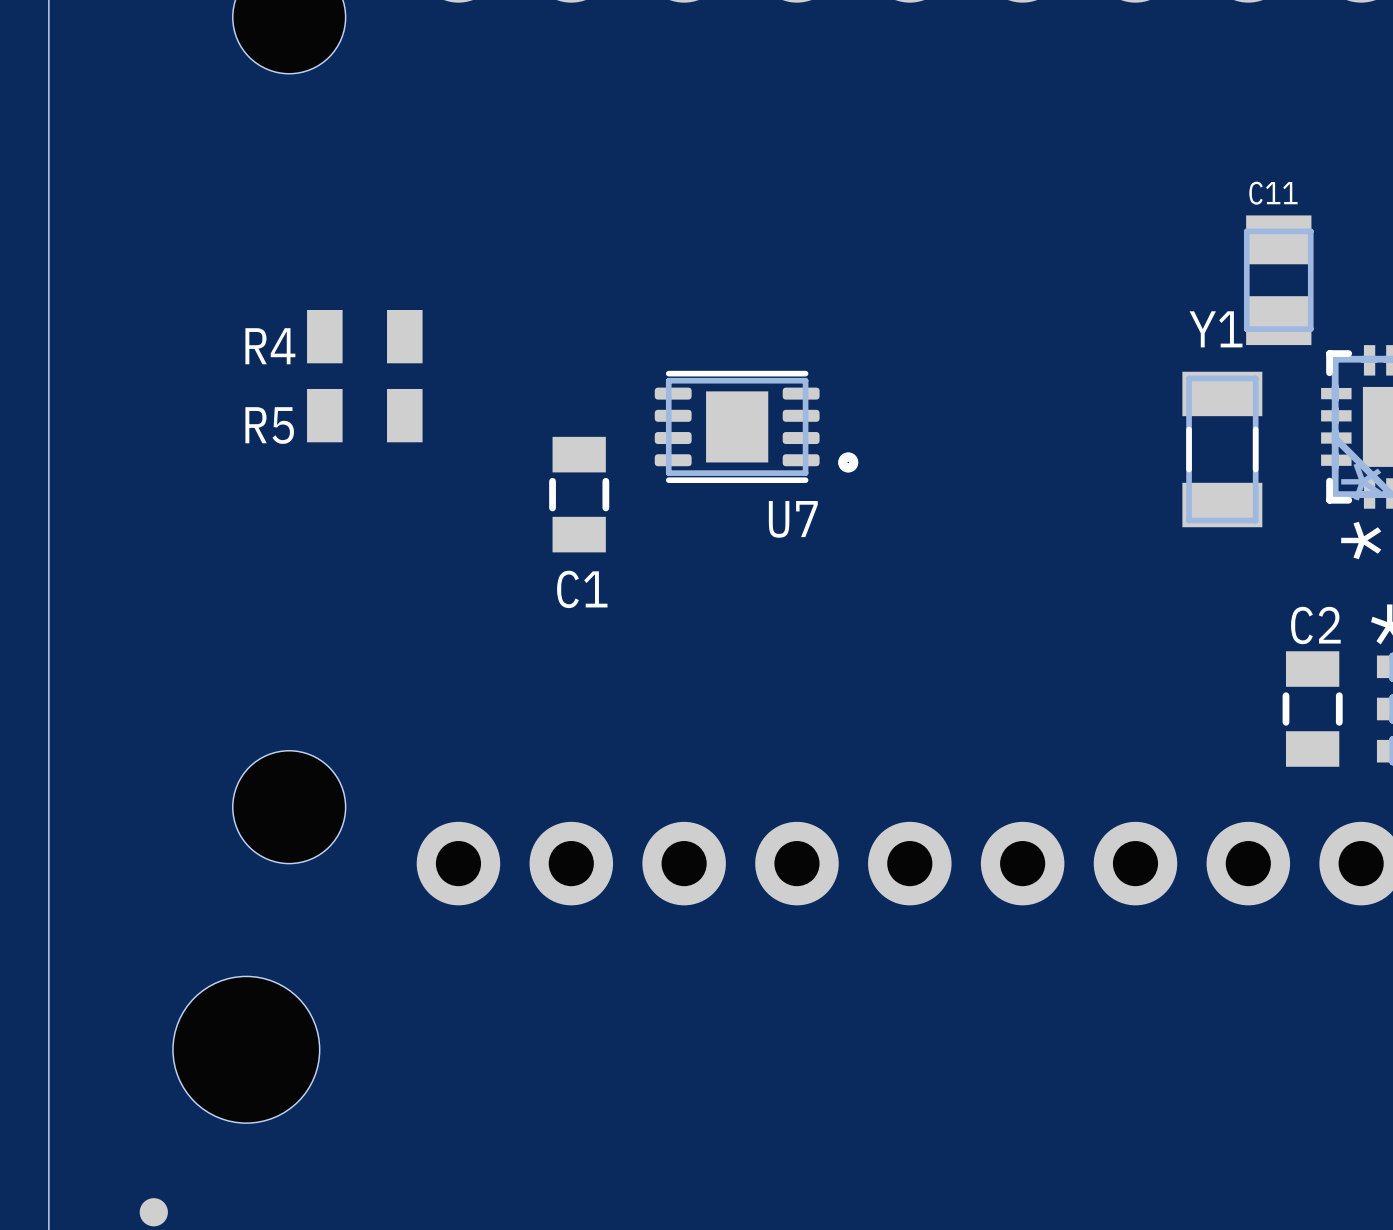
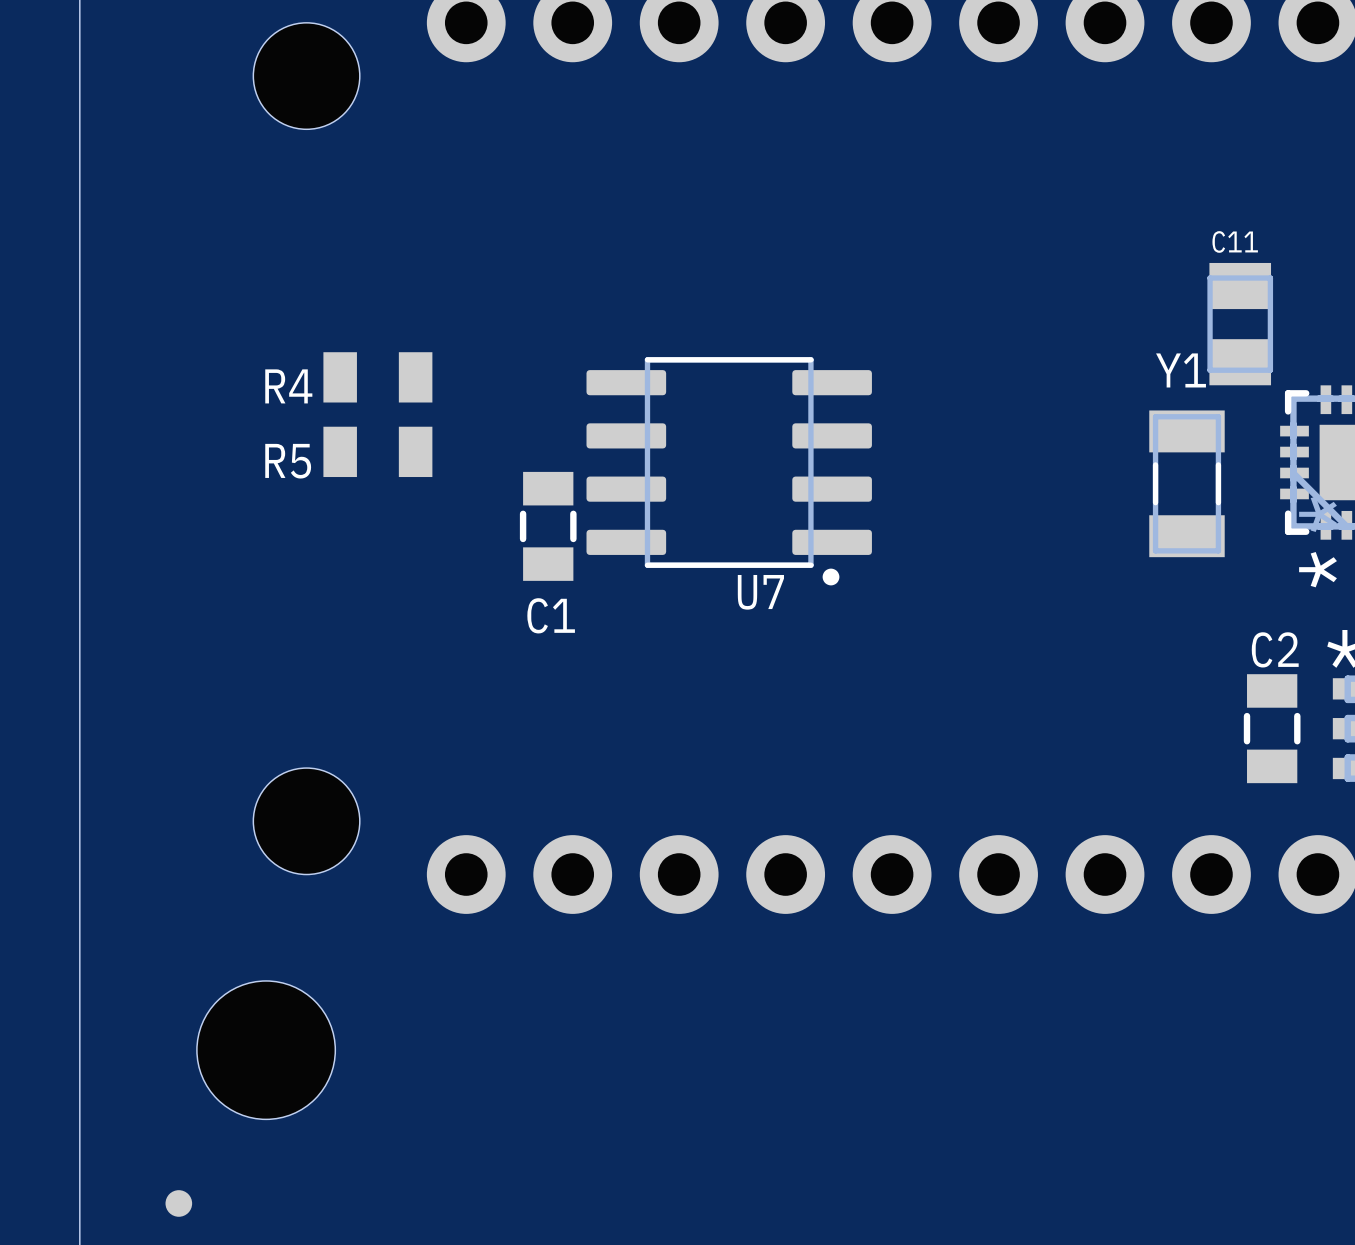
U7 footprint: [654, 370, 859, 484] -> [586, 357, 872, 586]
C1 position: (579, 494) -> (548, 526)

